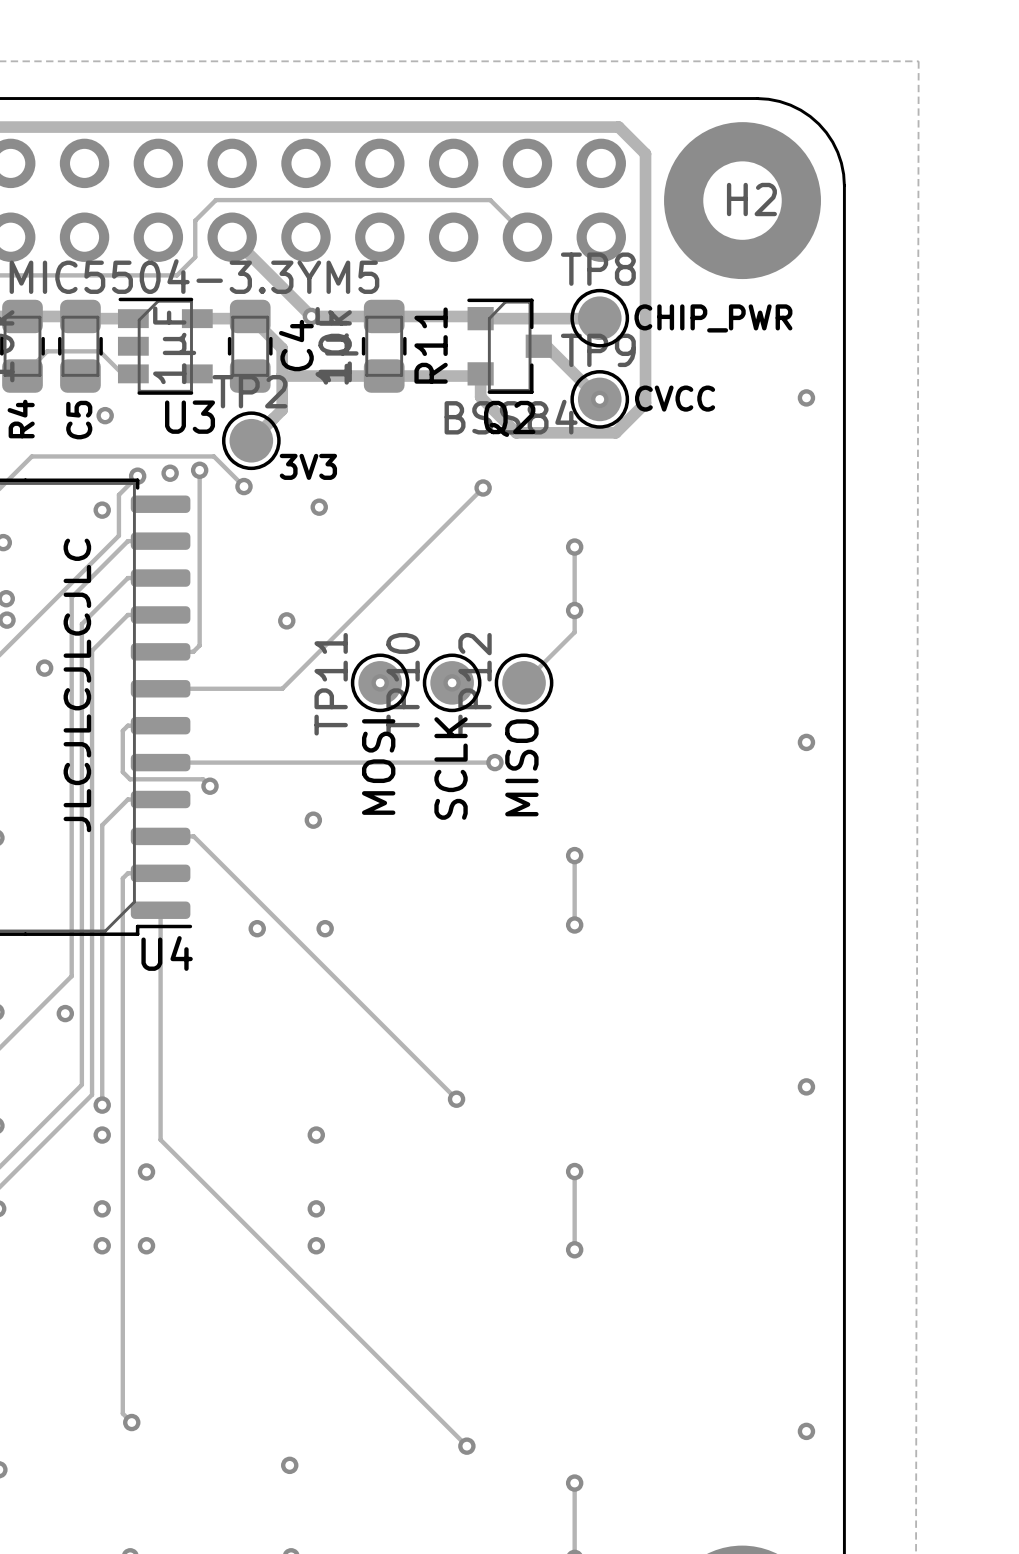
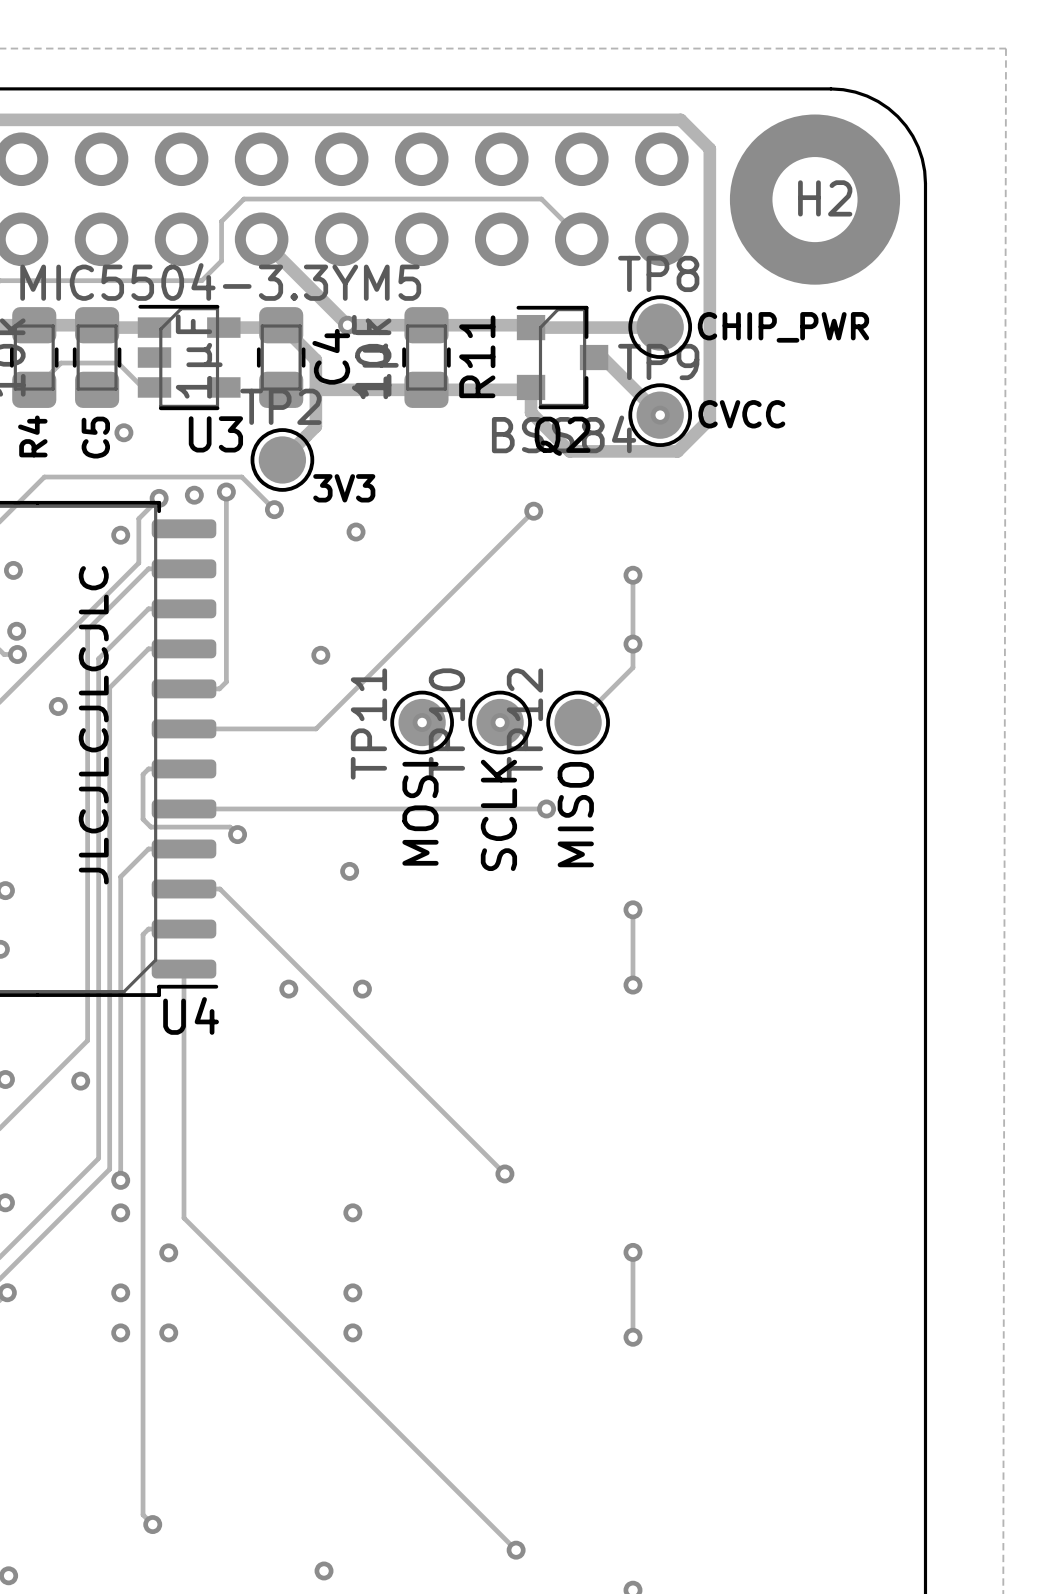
via: (806, 397) -> none
via: (806, 742) -> none
via: (806, 1086) -> none
via: (806, 1431) -> none

